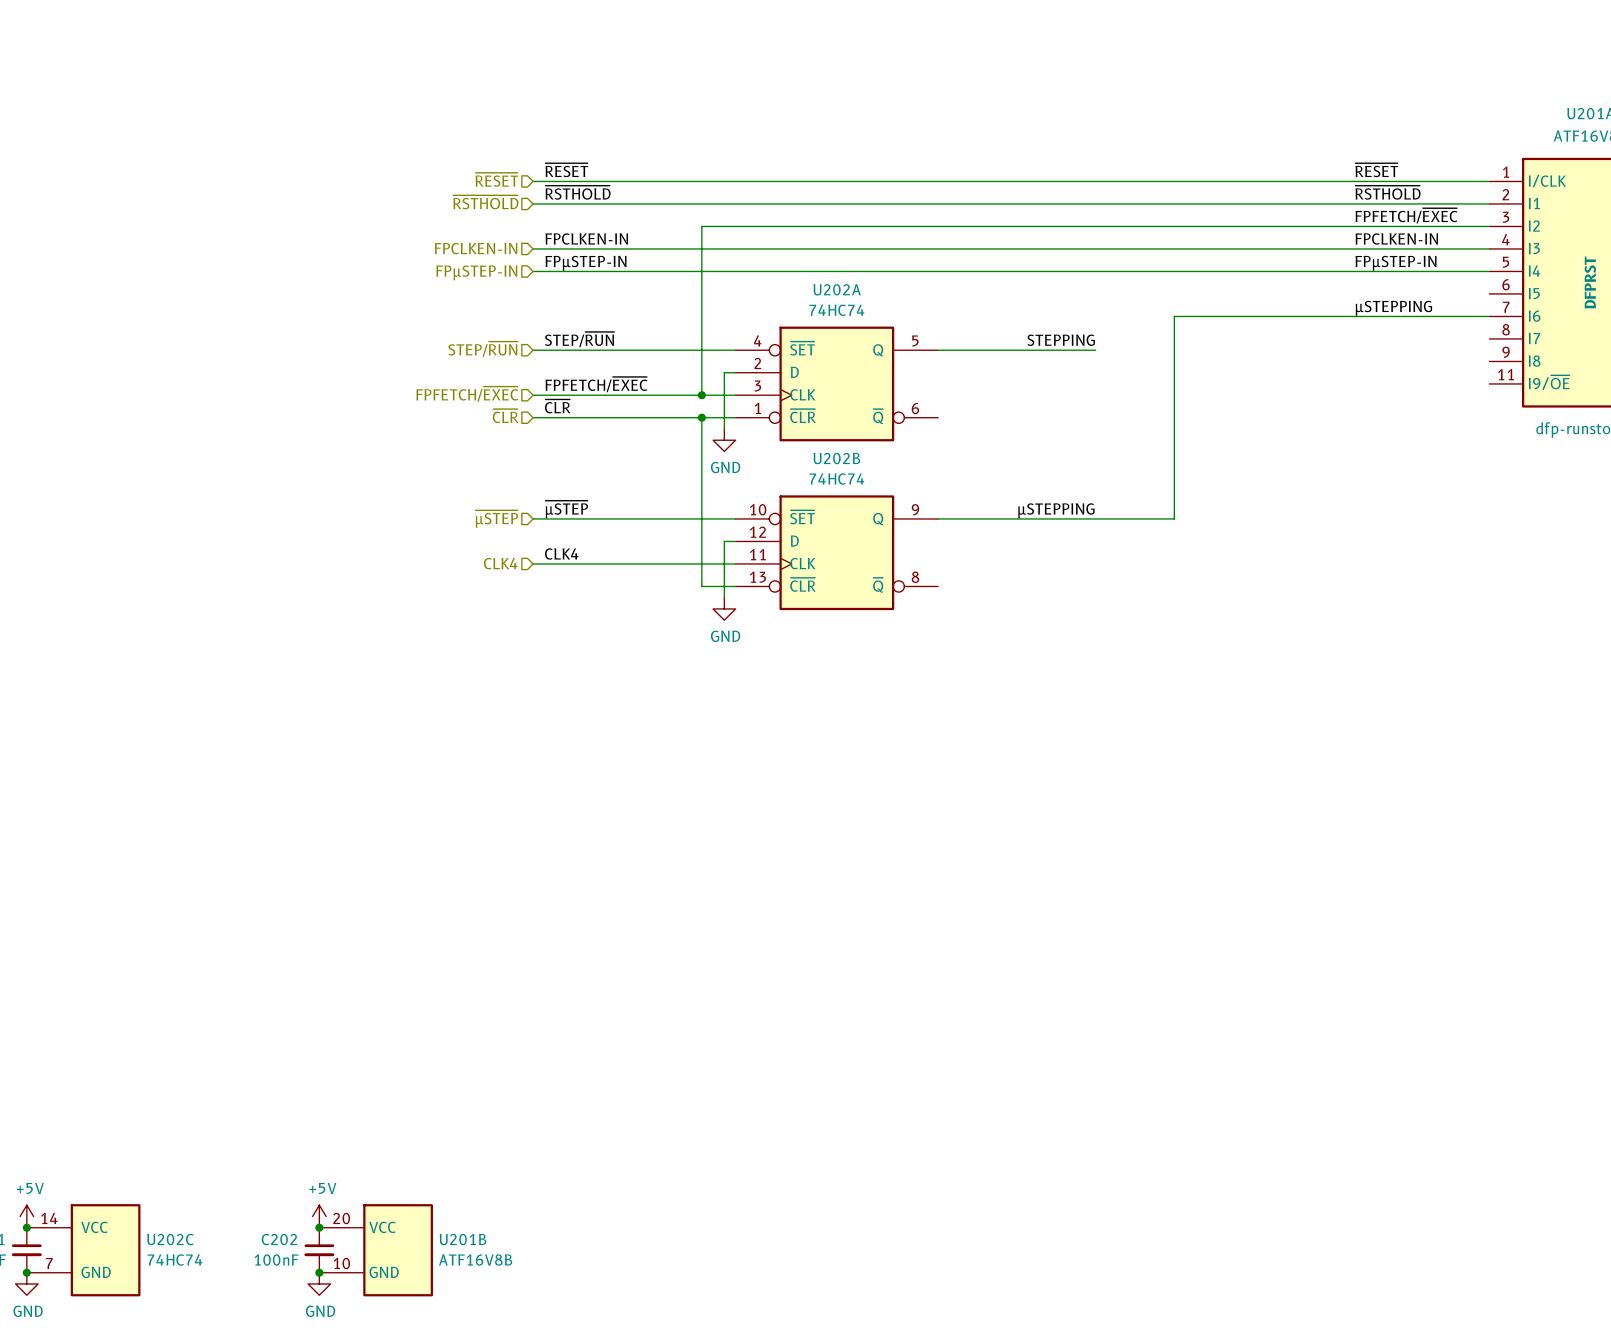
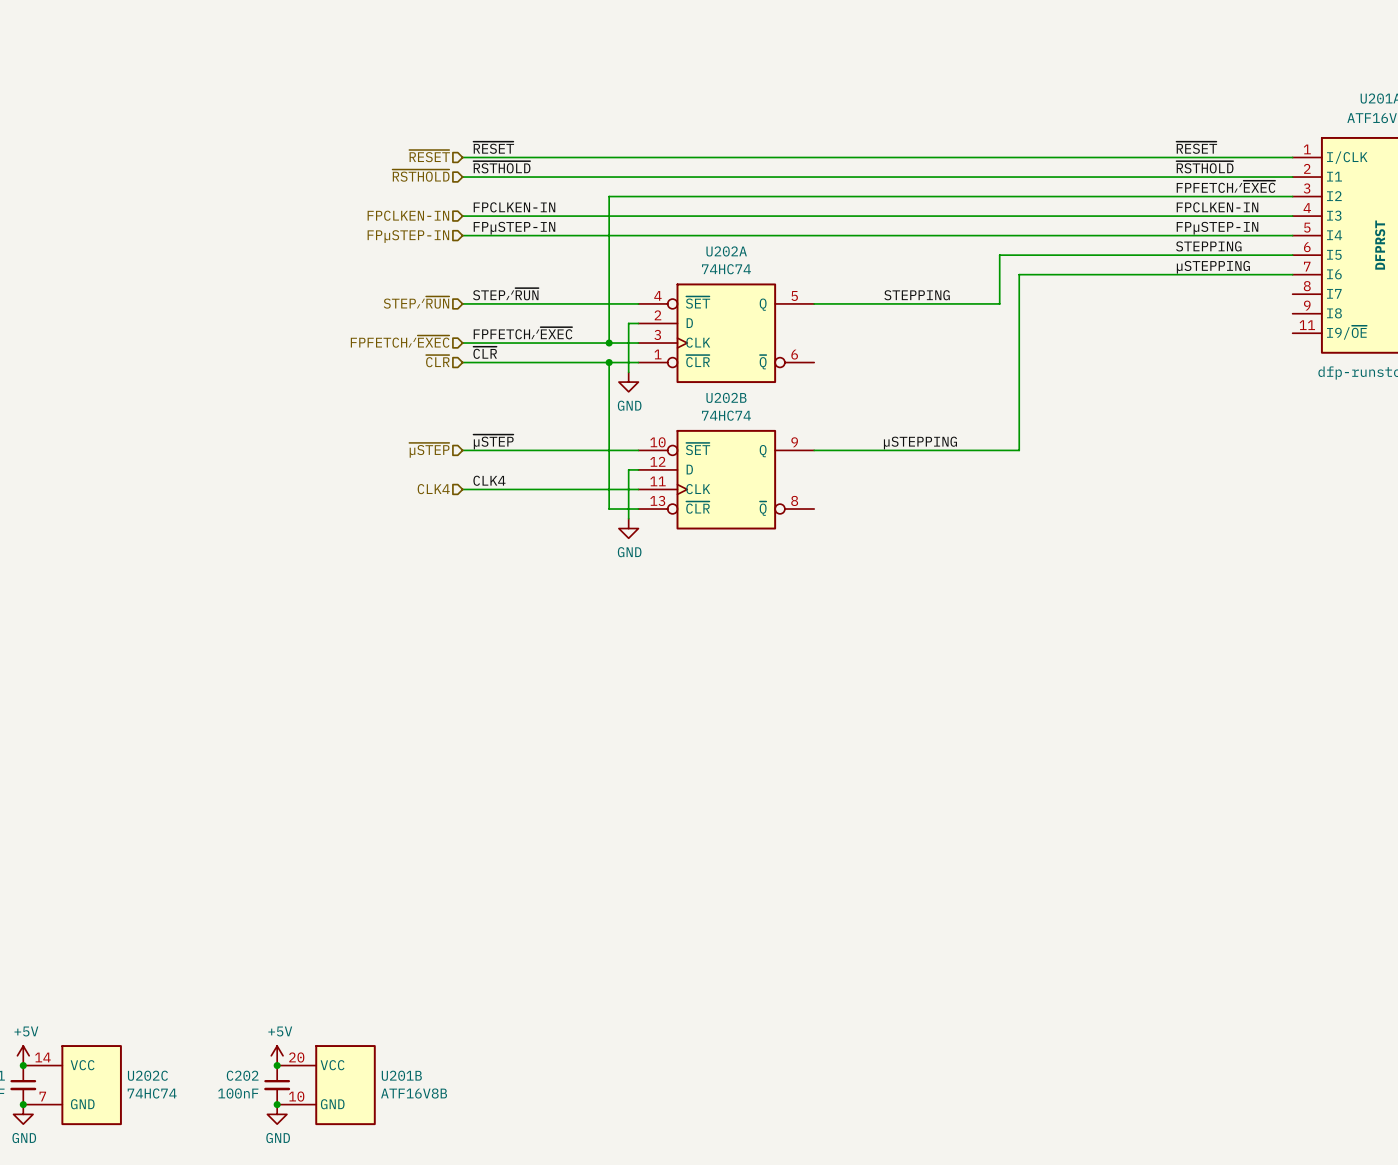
label: none -> STEPPING (1208, 246)
wire: none -> (1292, 255) (999, 255) (999, 303) (950, 303)

